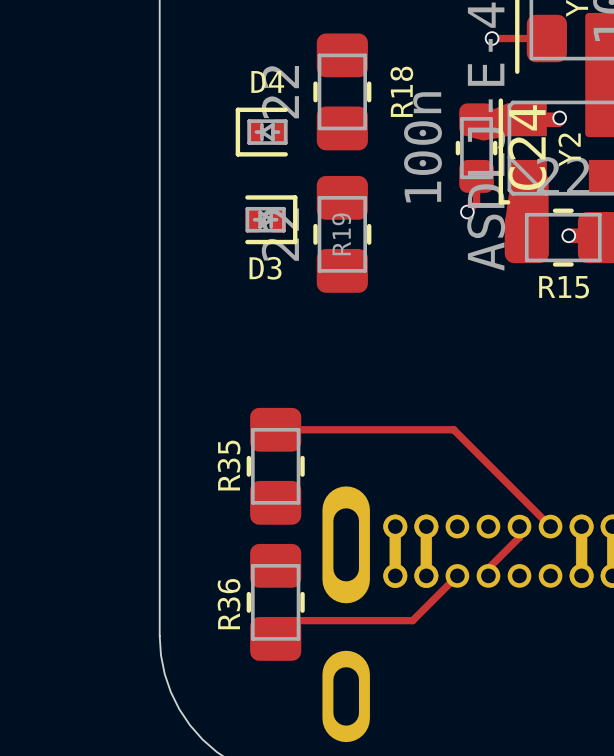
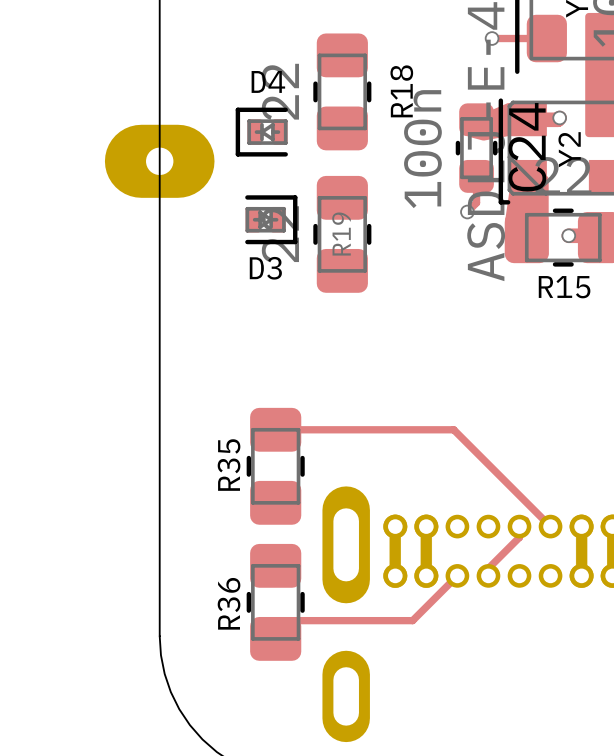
part: none -> (159, 161)

